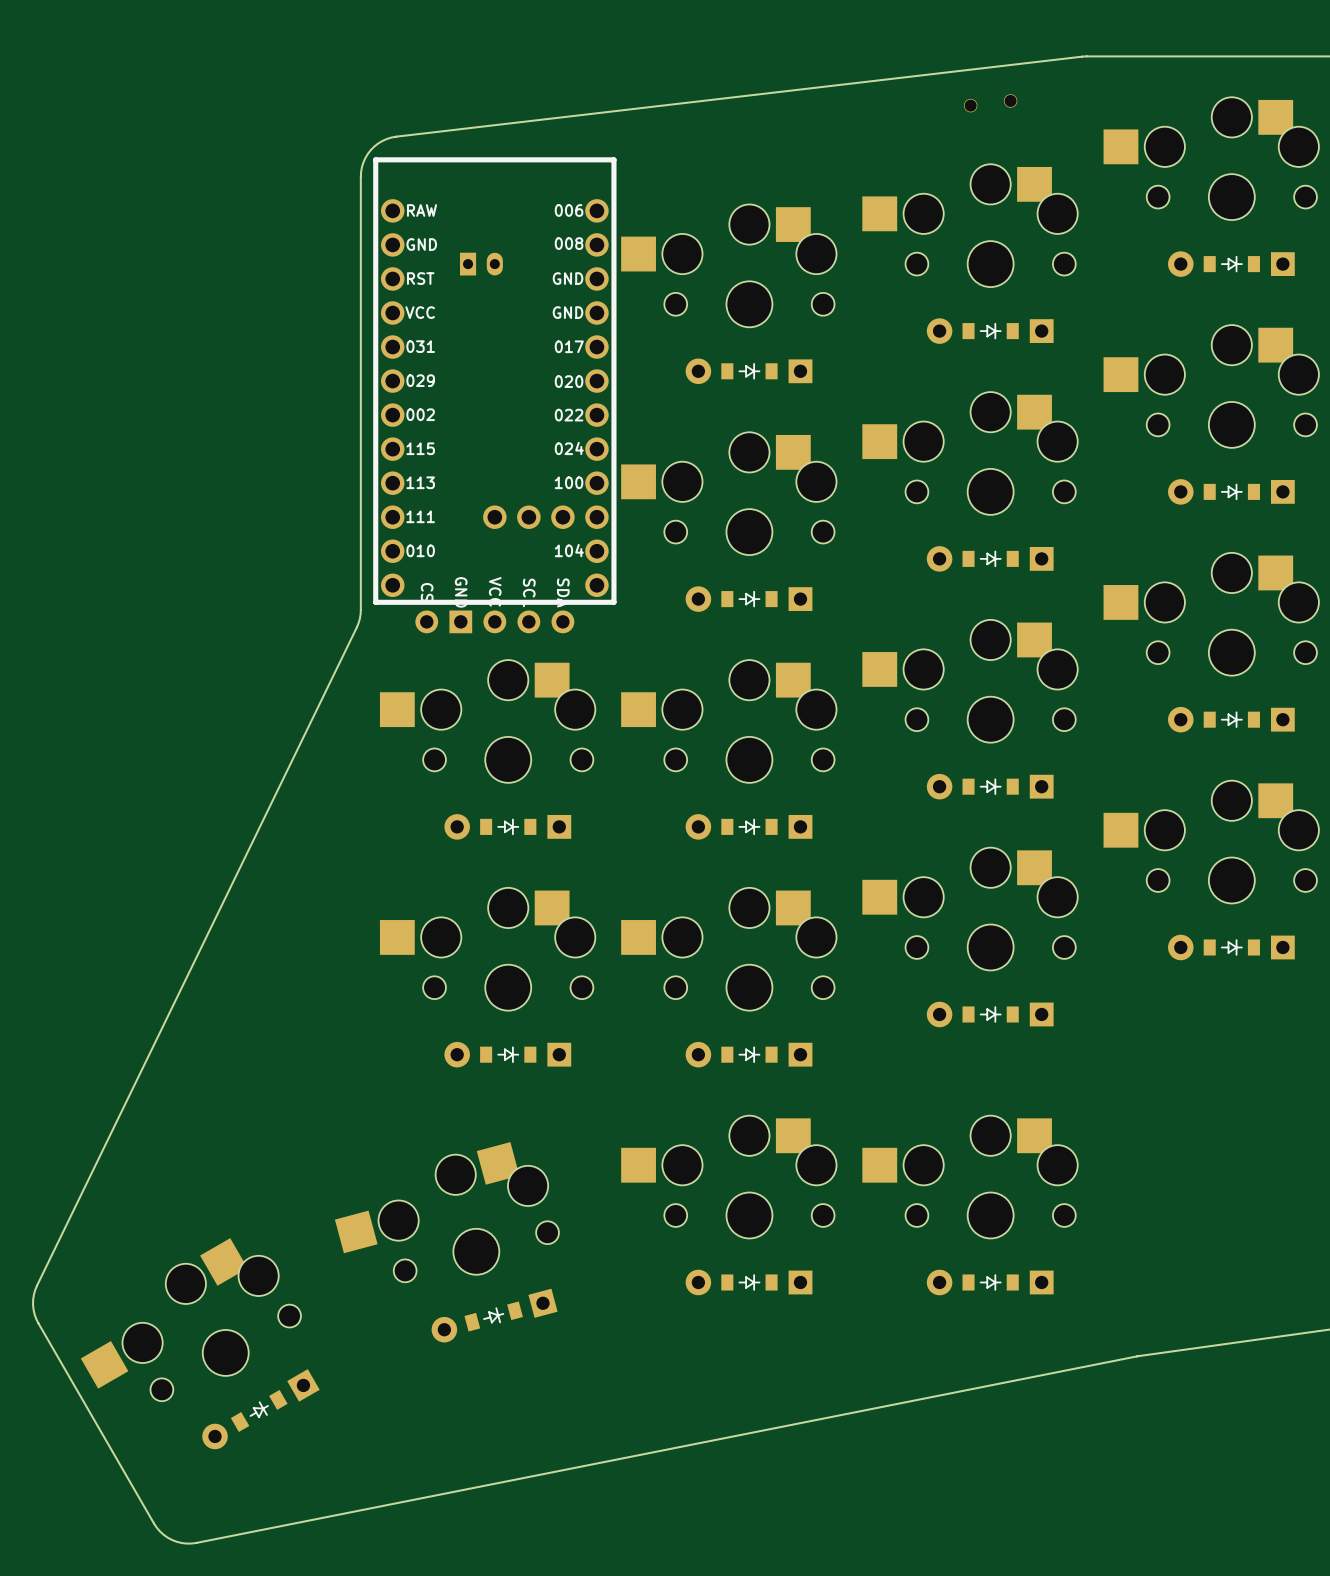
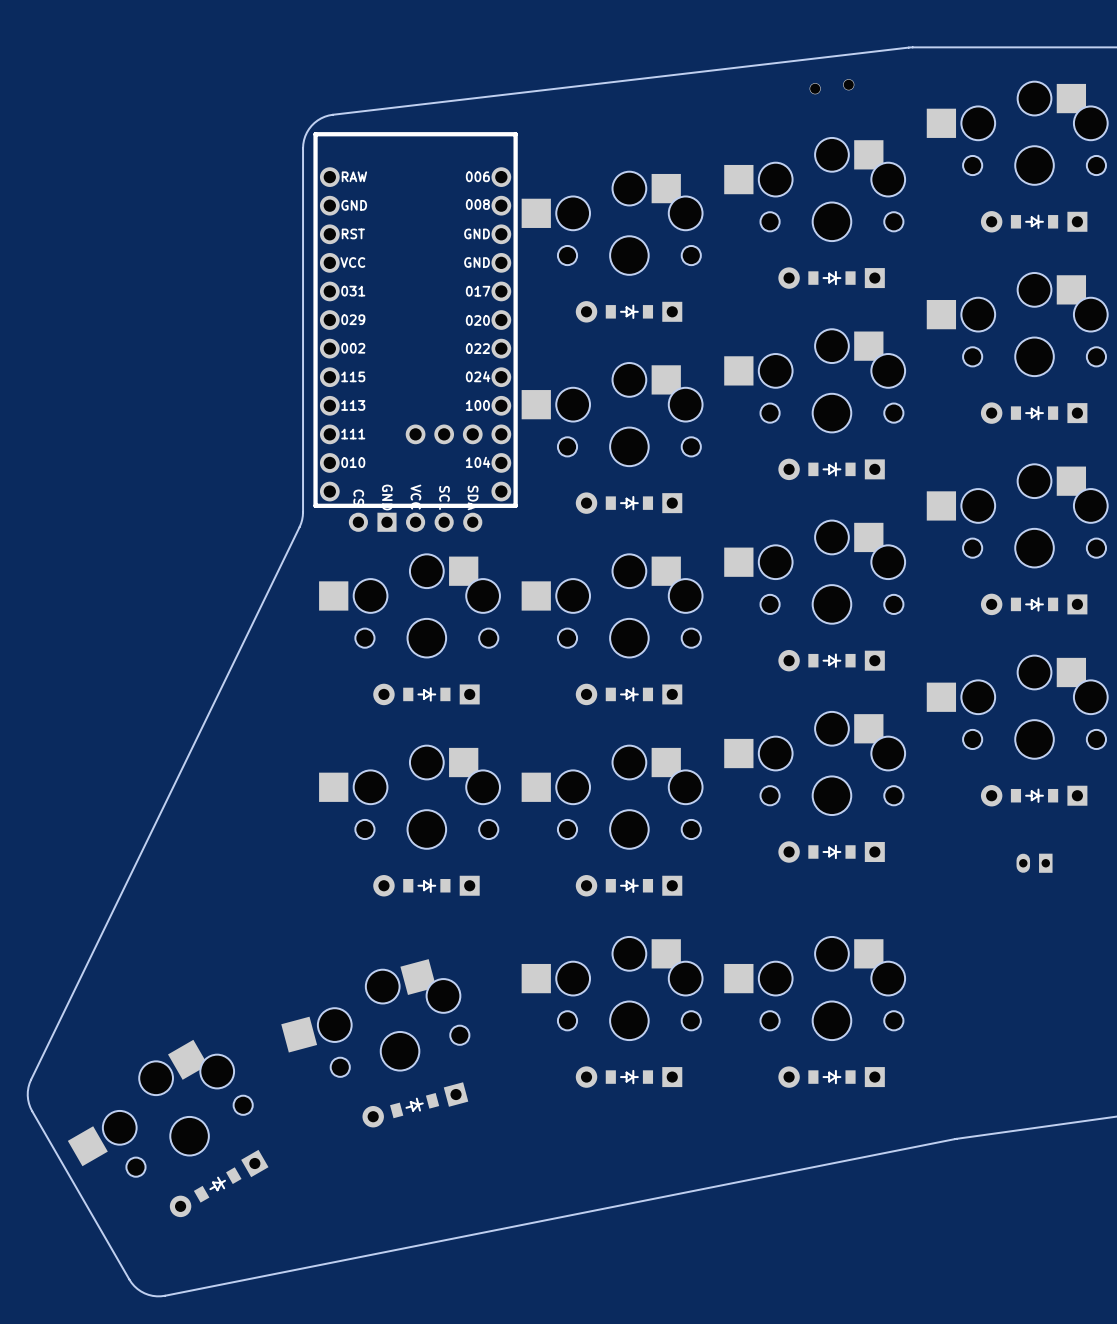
part: (481, 264) -> none
part: none -> (1034, 863)

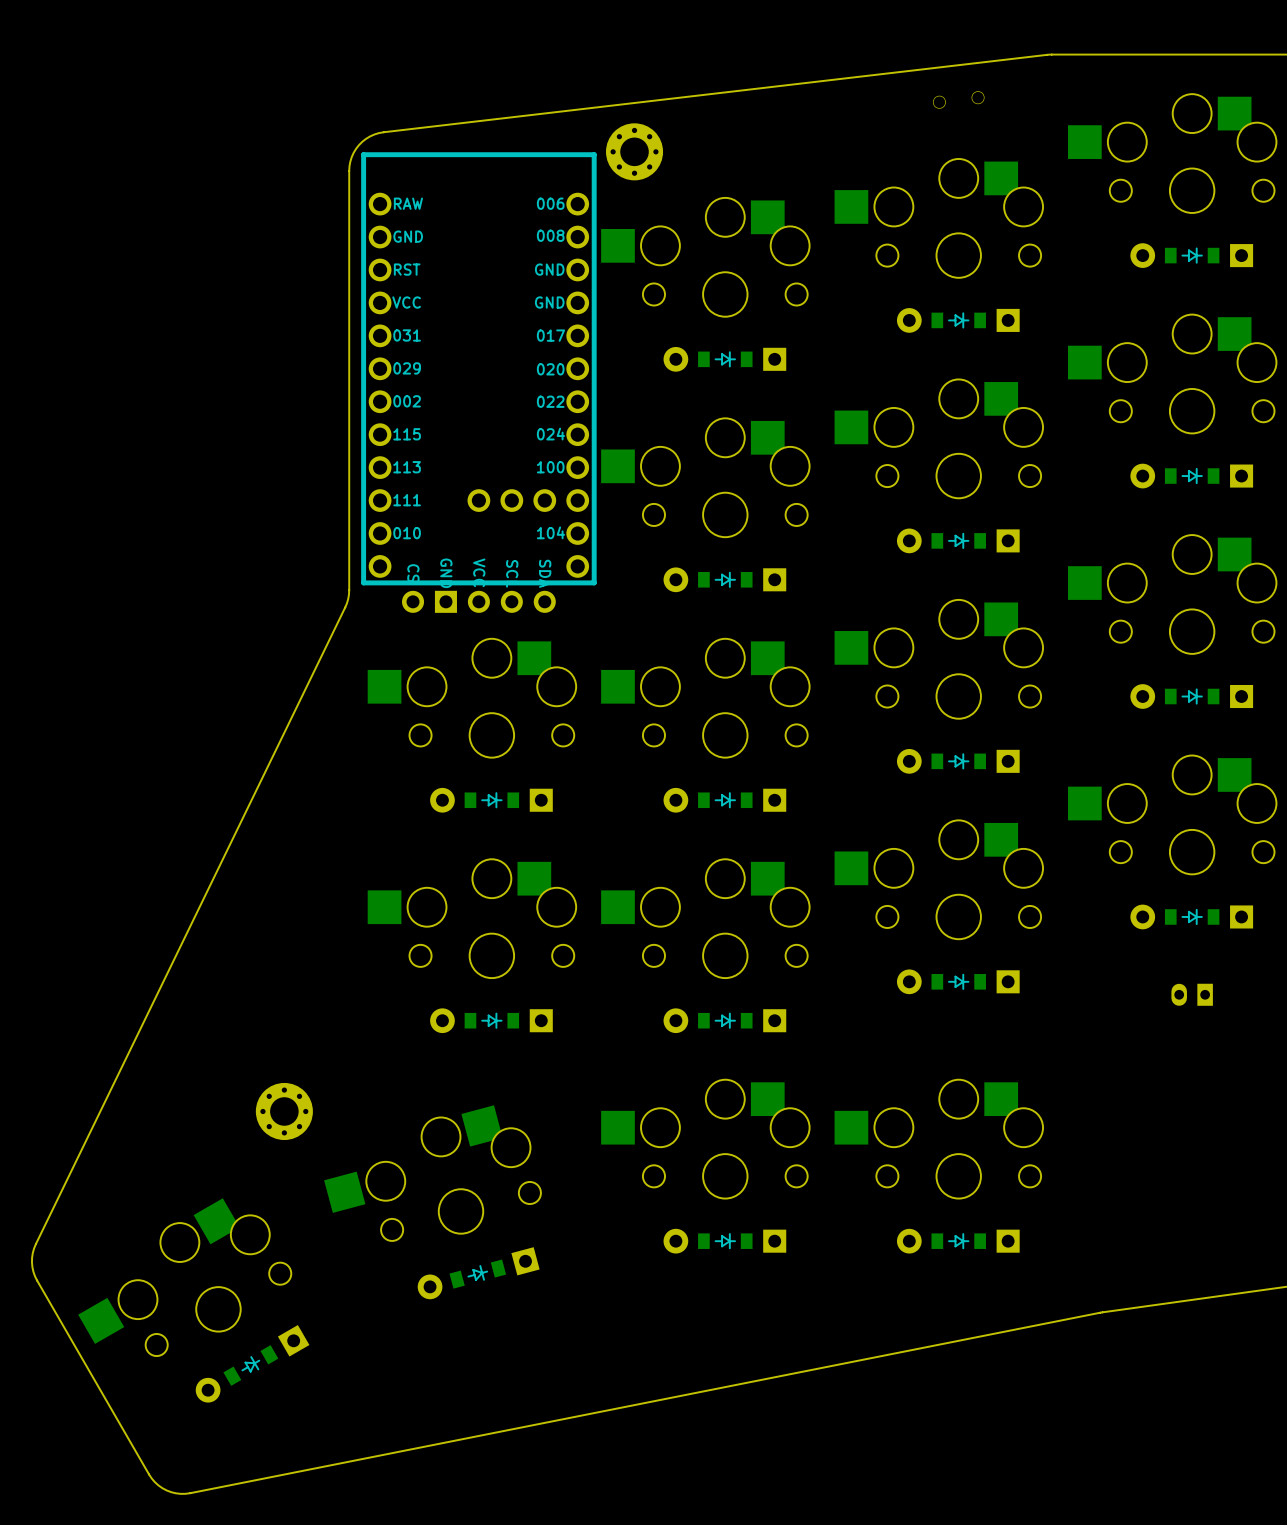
part: none -> (634, 151)
part: none -> (284, 1111)

